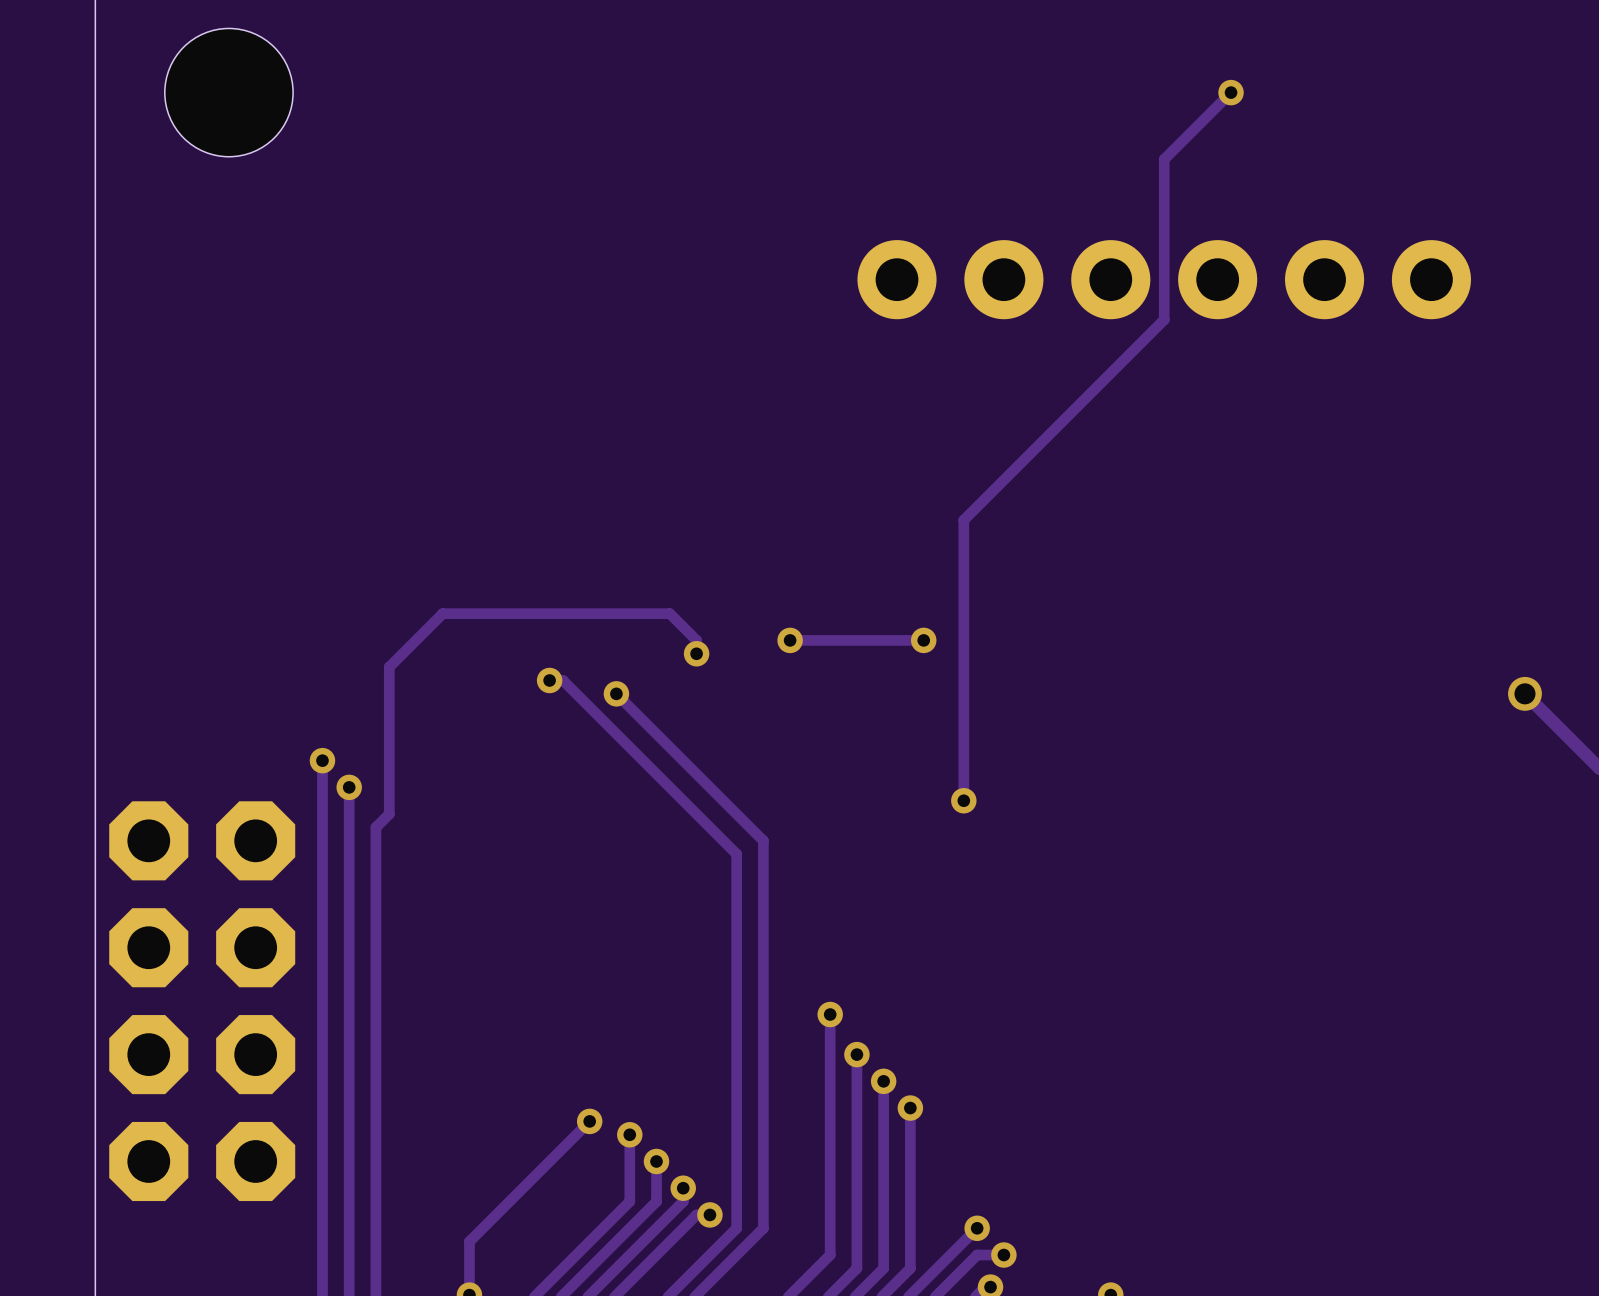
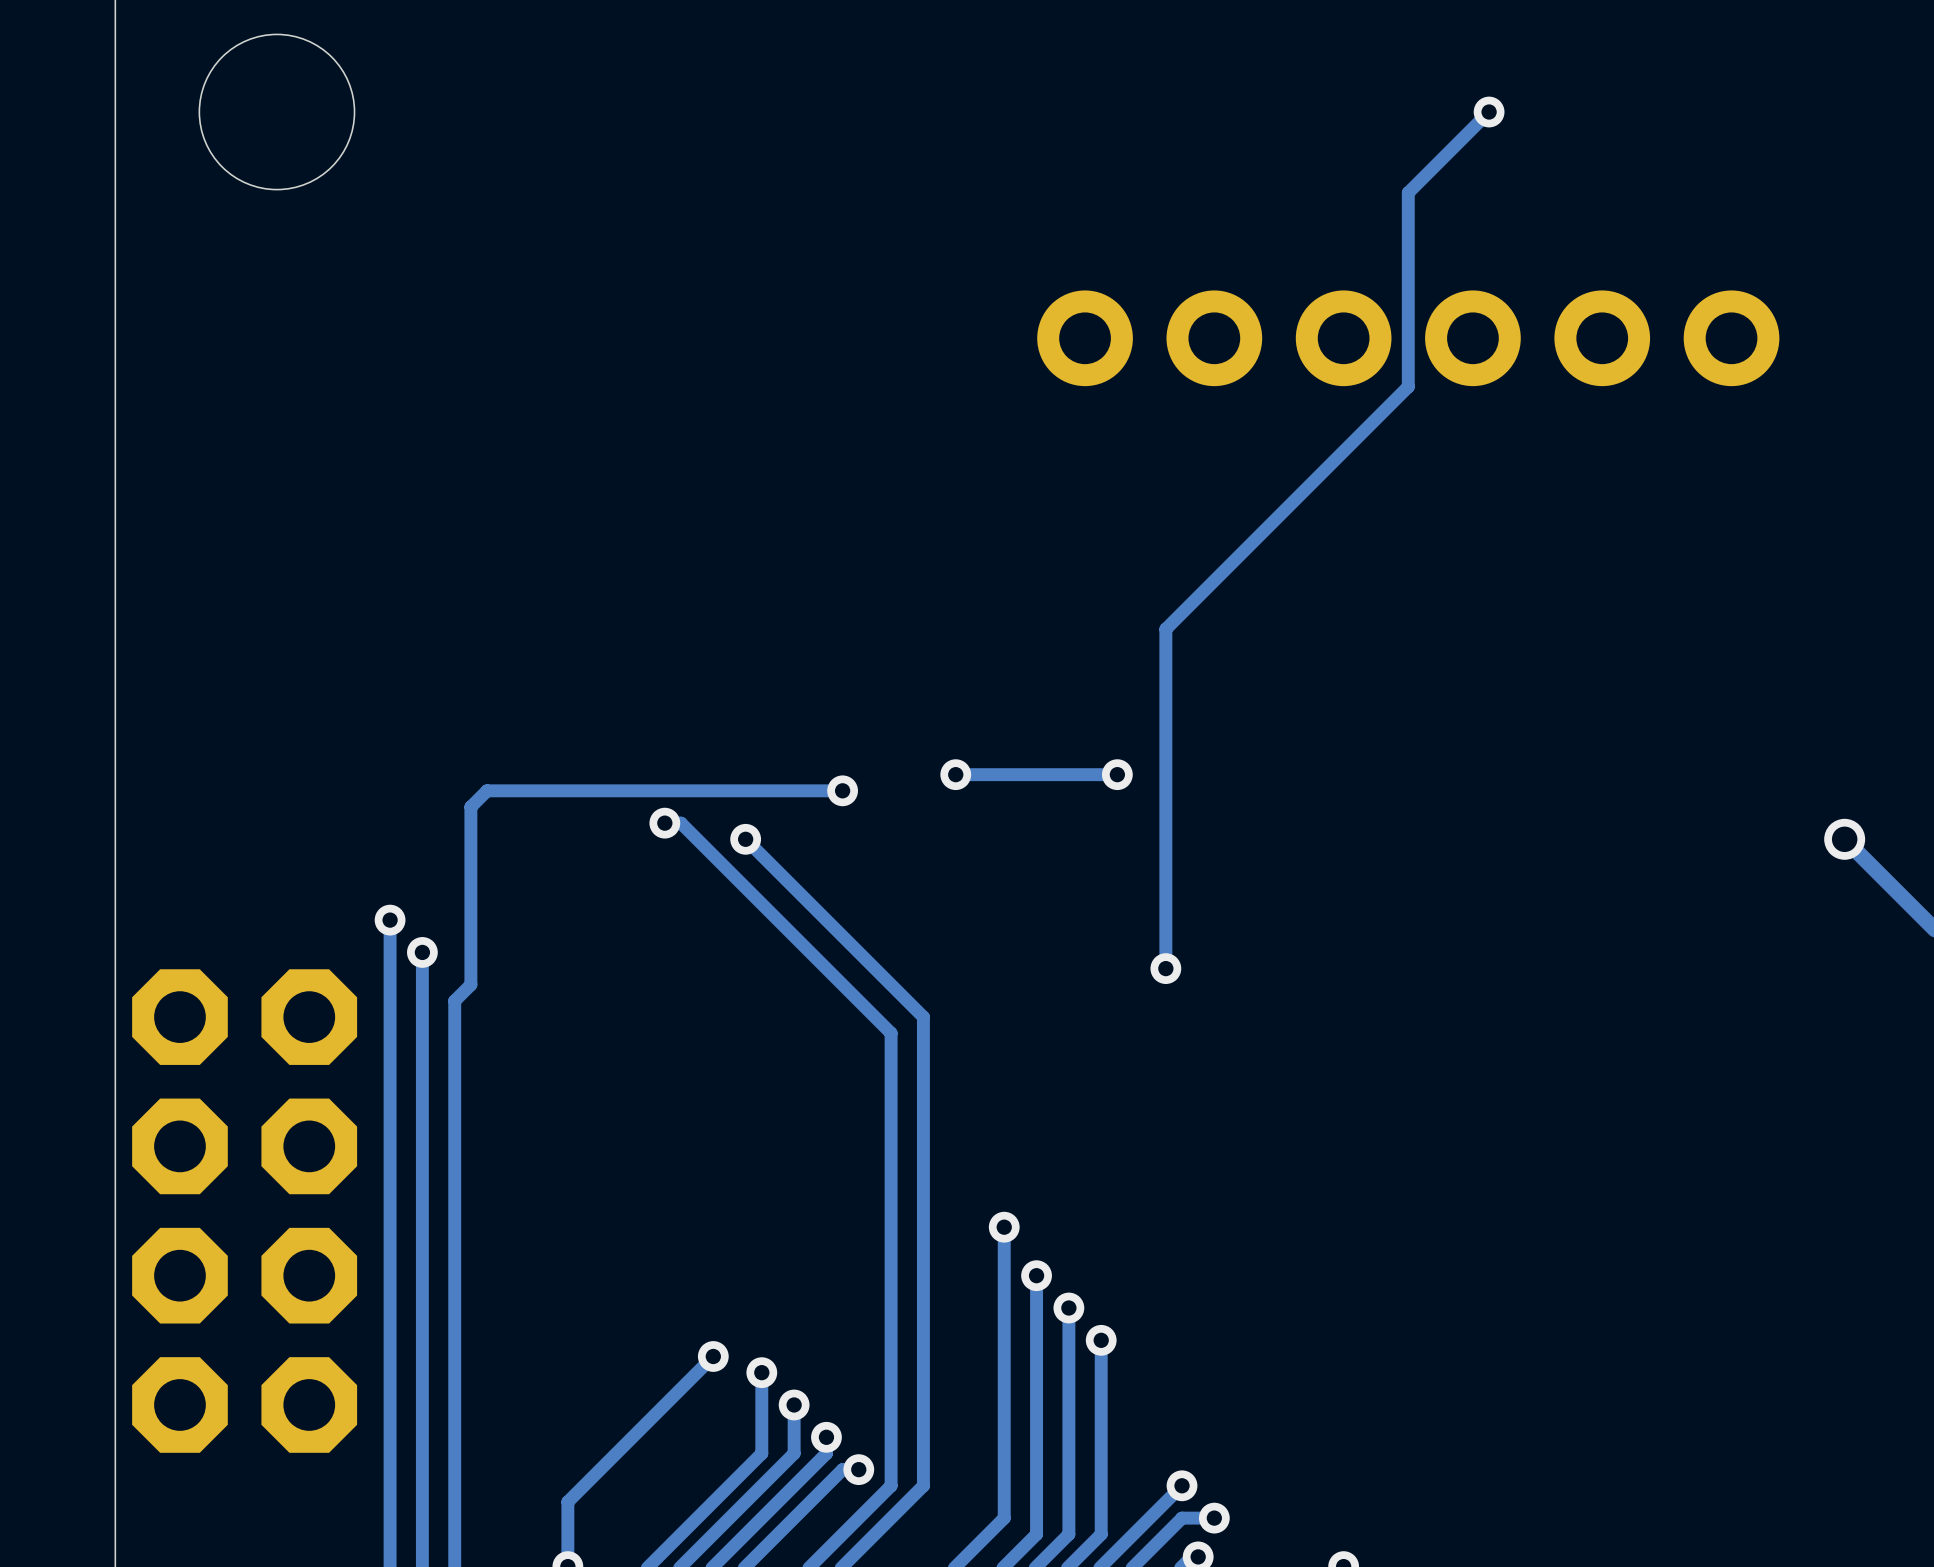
track: (696, 653) (696, 640) (669, 613) (442, 613) (402, 653) -> (842, 790) (487, 790)

